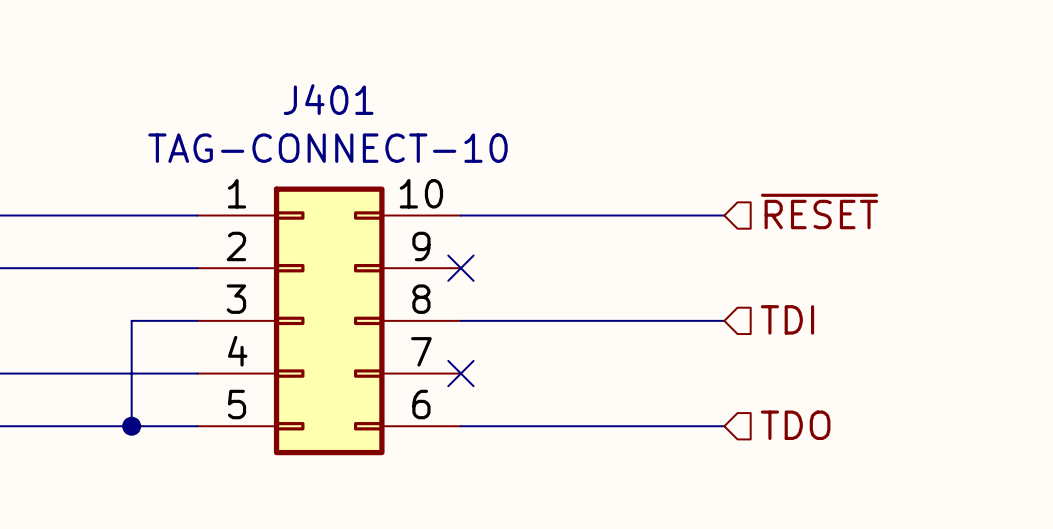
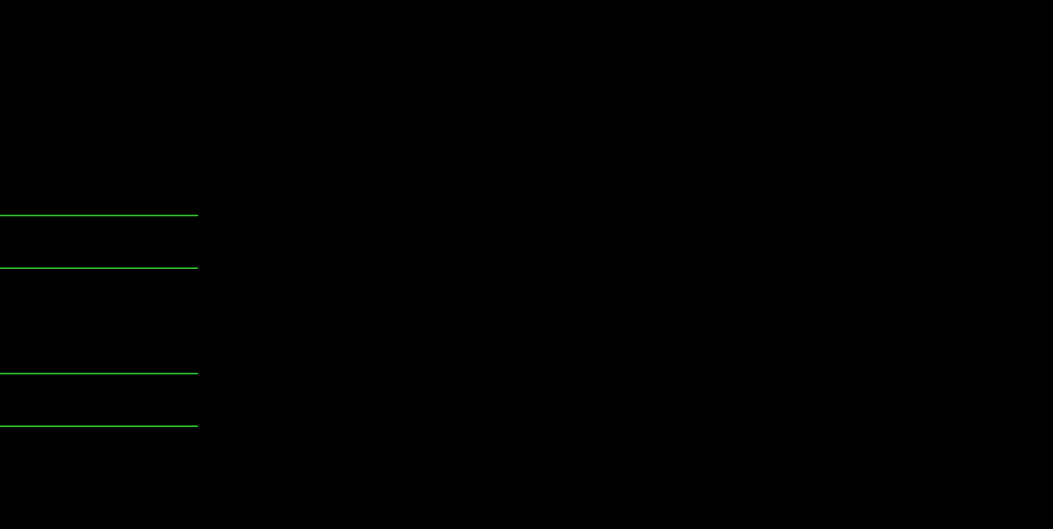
hierarchical label: ~{RESET} (819, 211) -> none
wire: (460, 215) (724, 215) -> none
no-connect mark: (460, 268) -> none
hierarchical label: TDI (787, 319) -> none
wire: (197, 320) (131, 320) (131, 426) -> none
J401: TAG-CONNECT-10 (329, 320) -> none
wire: (460, 320) (724, 320) -> none
no-connect mark: (460, 373) -> none
hierarchical label: TDO (795, 425) -> none
junction: (131, 426) -> none
wire: (460, 426) (724, 426) -> none

